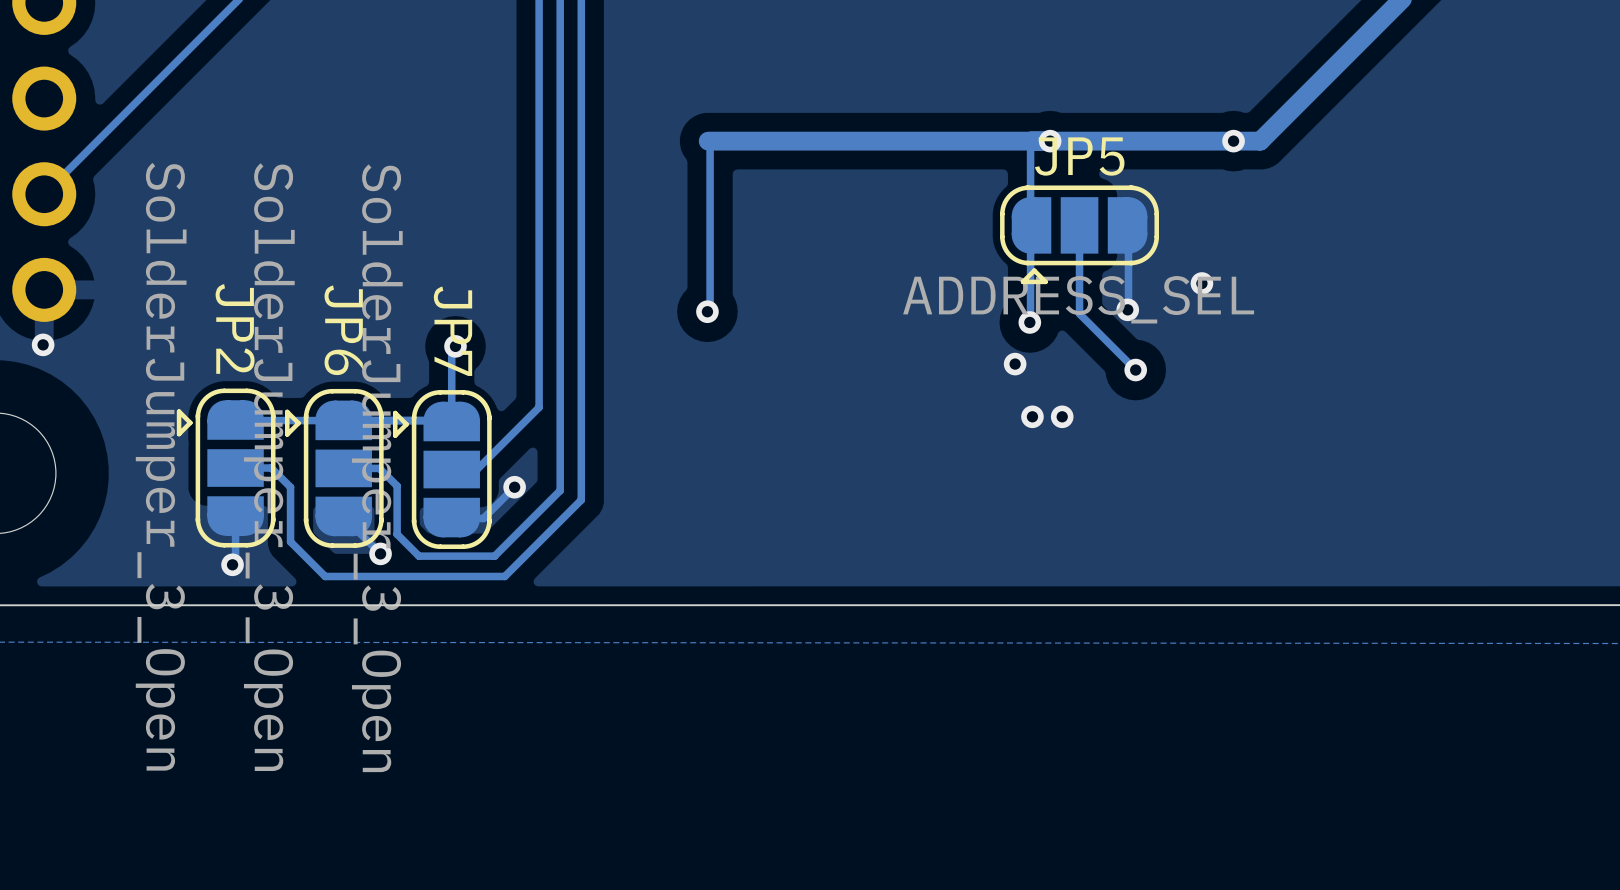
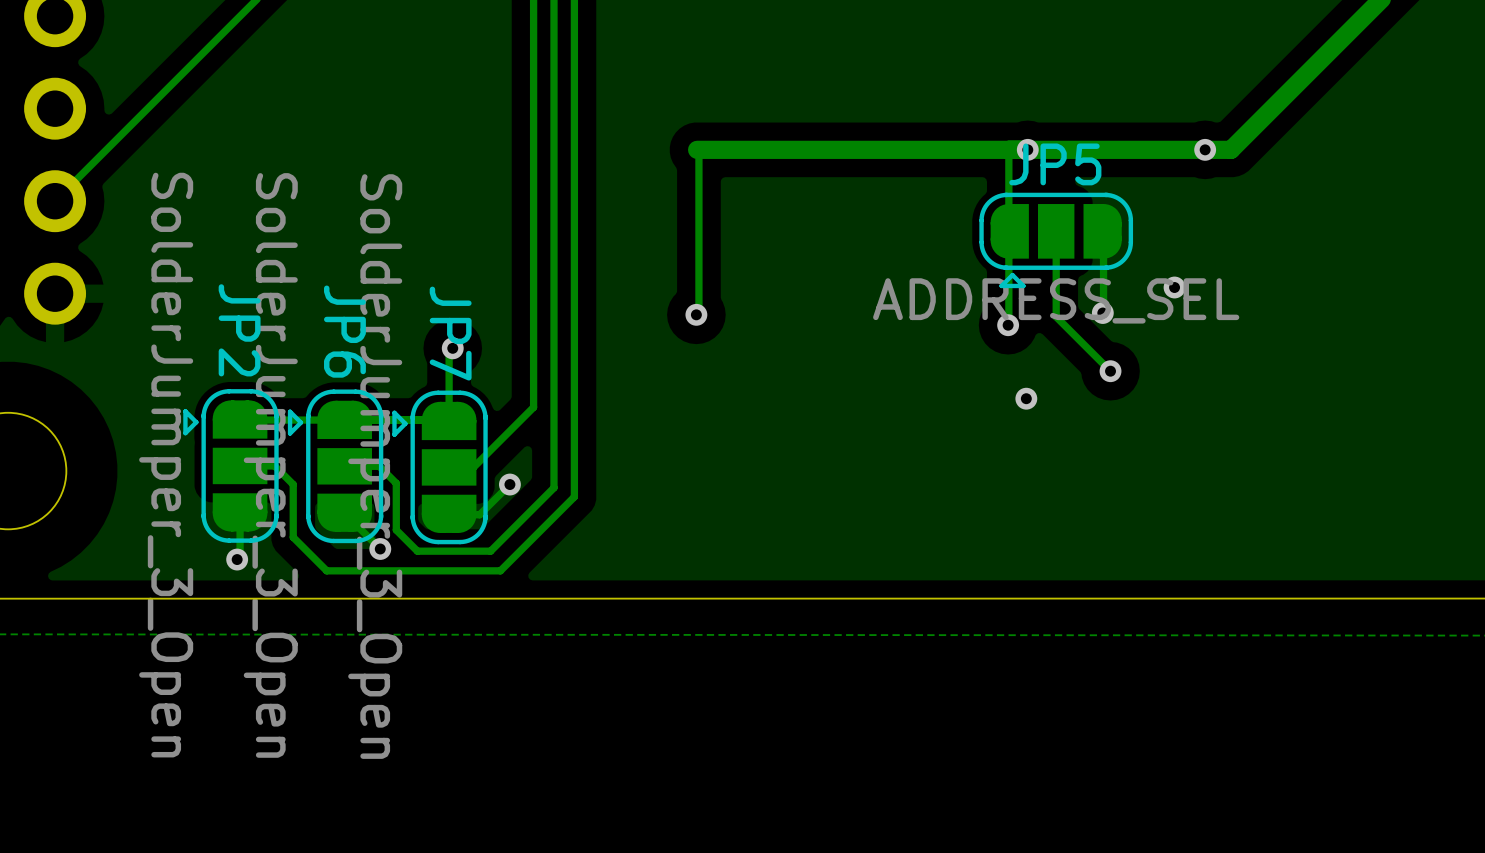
via: (43, 344) -> none
via: (1015, 364) -> none
via: none -> (1026, 398)
via: (1032, 416) -> none
via: (1062, 416) -> none

